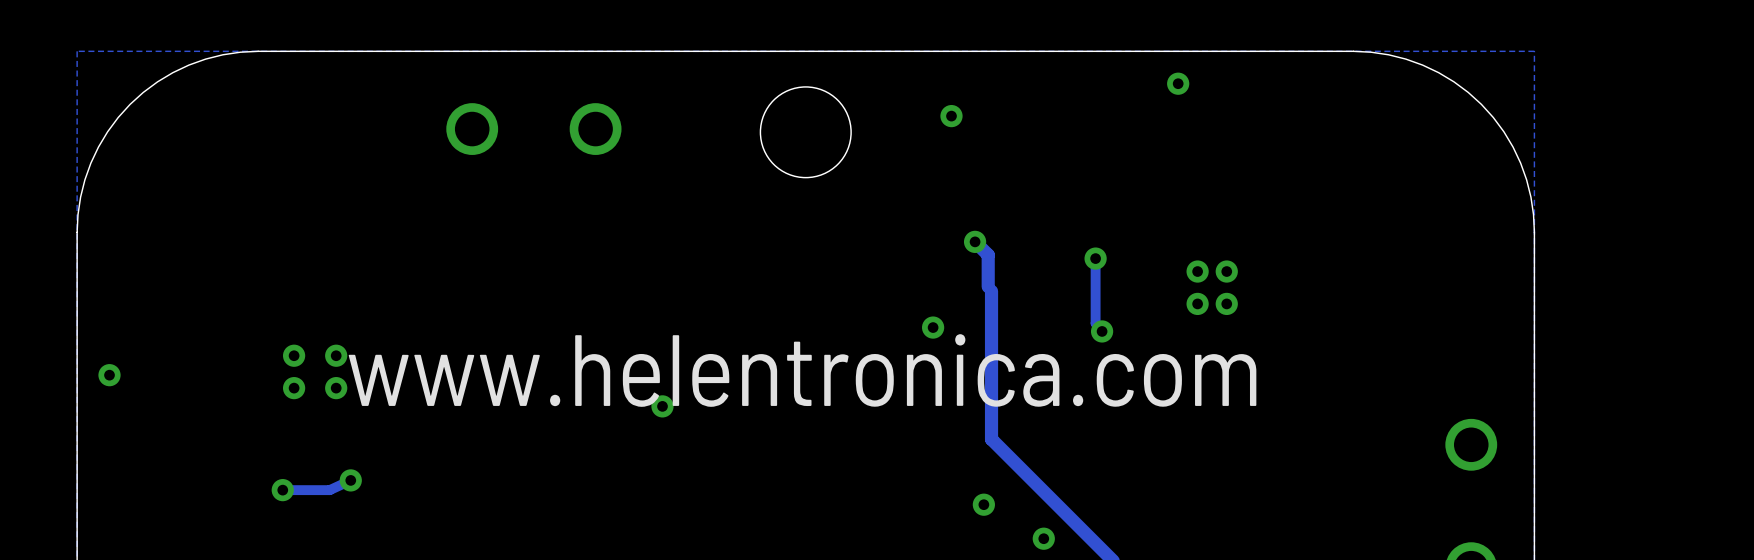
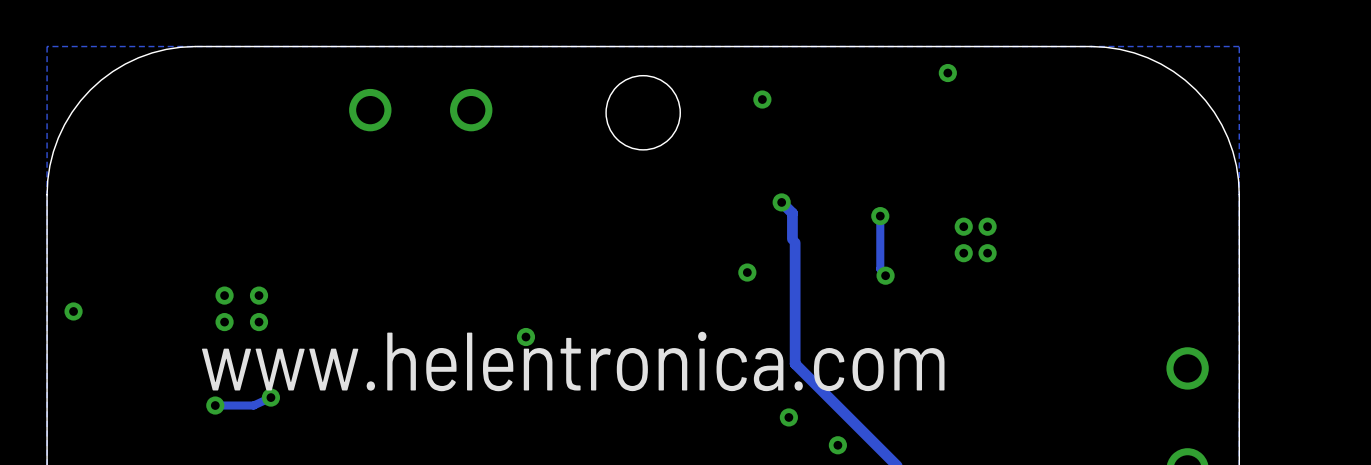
text position: www.helentronica.com (802, 370) -> www.helentronica.com (573, 361)

